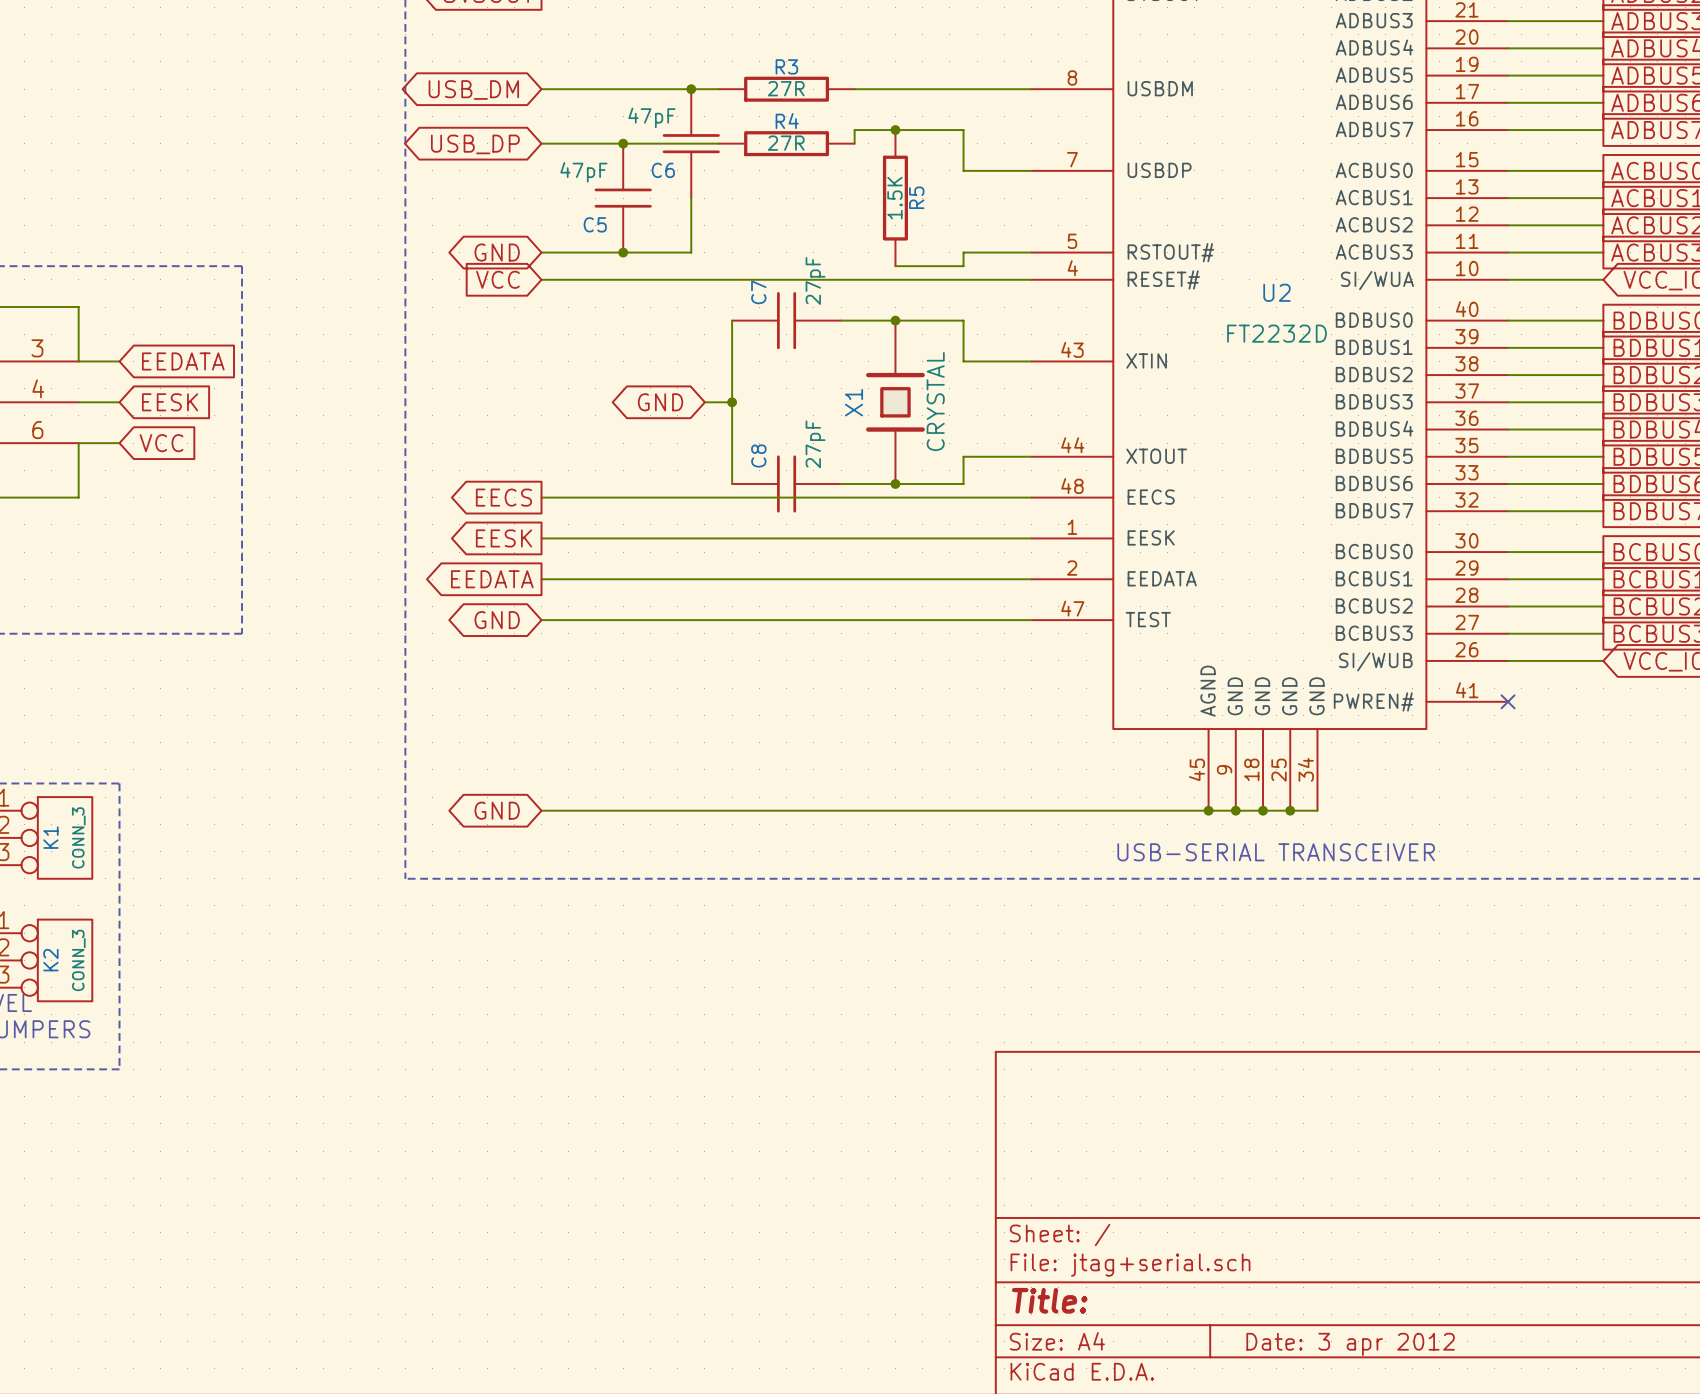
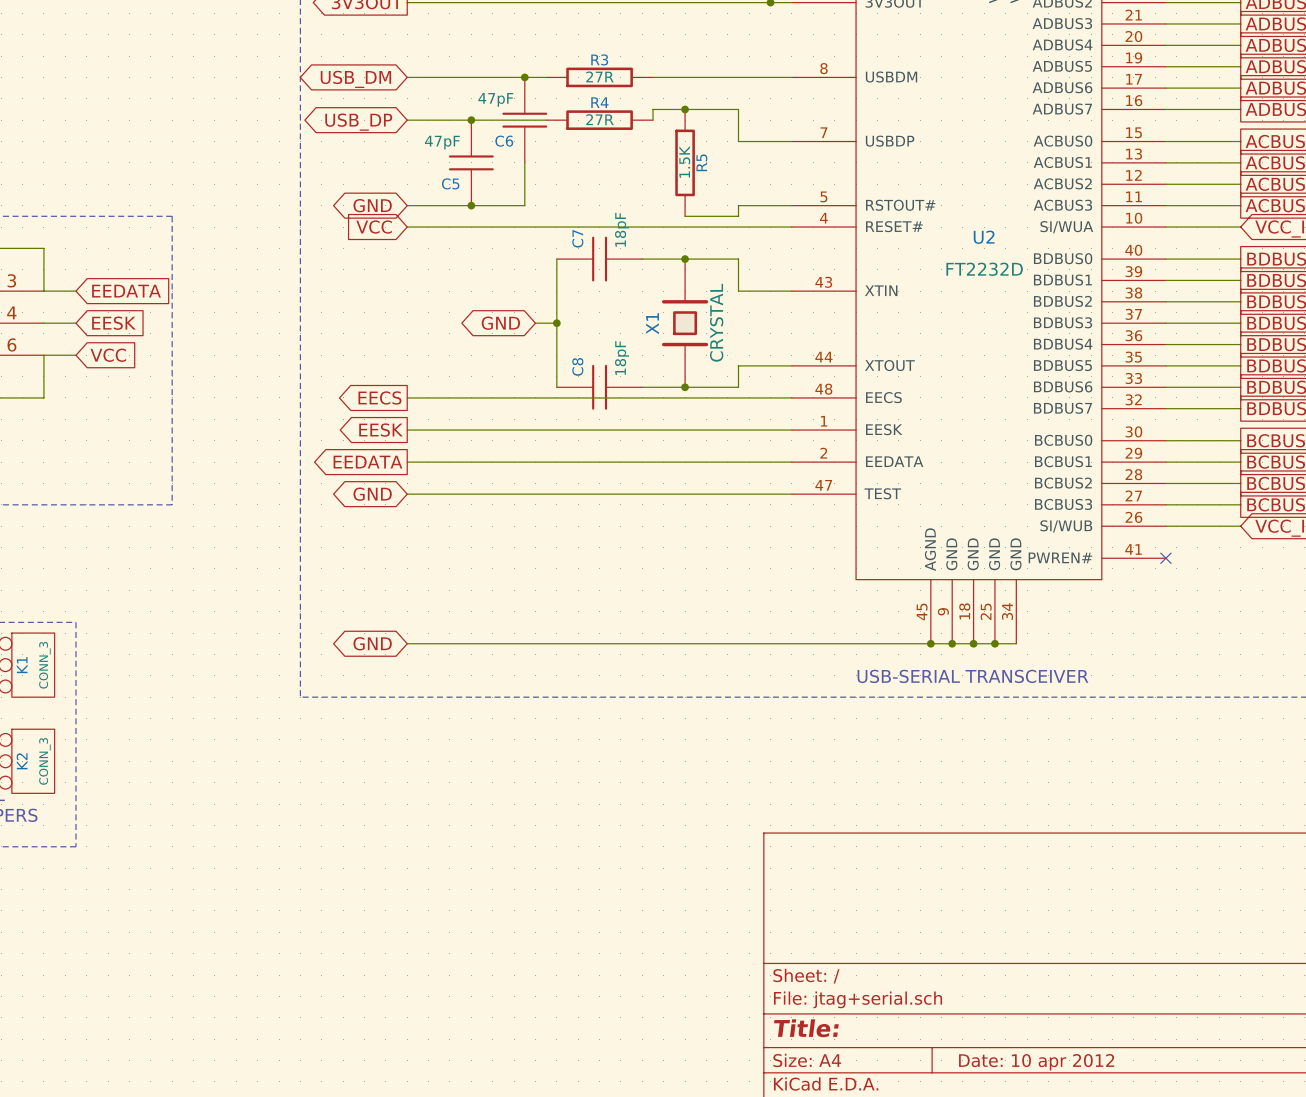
C7 value: 27pF (815, 280) -> 18pF (621, 229)
C8 value: 27pF (815, 444) -> 18pF (621, 358)
title block: Date: 3 apr 2012 (1350, 1344) -> Date: 10 apr 2012 (1036, 1062)

